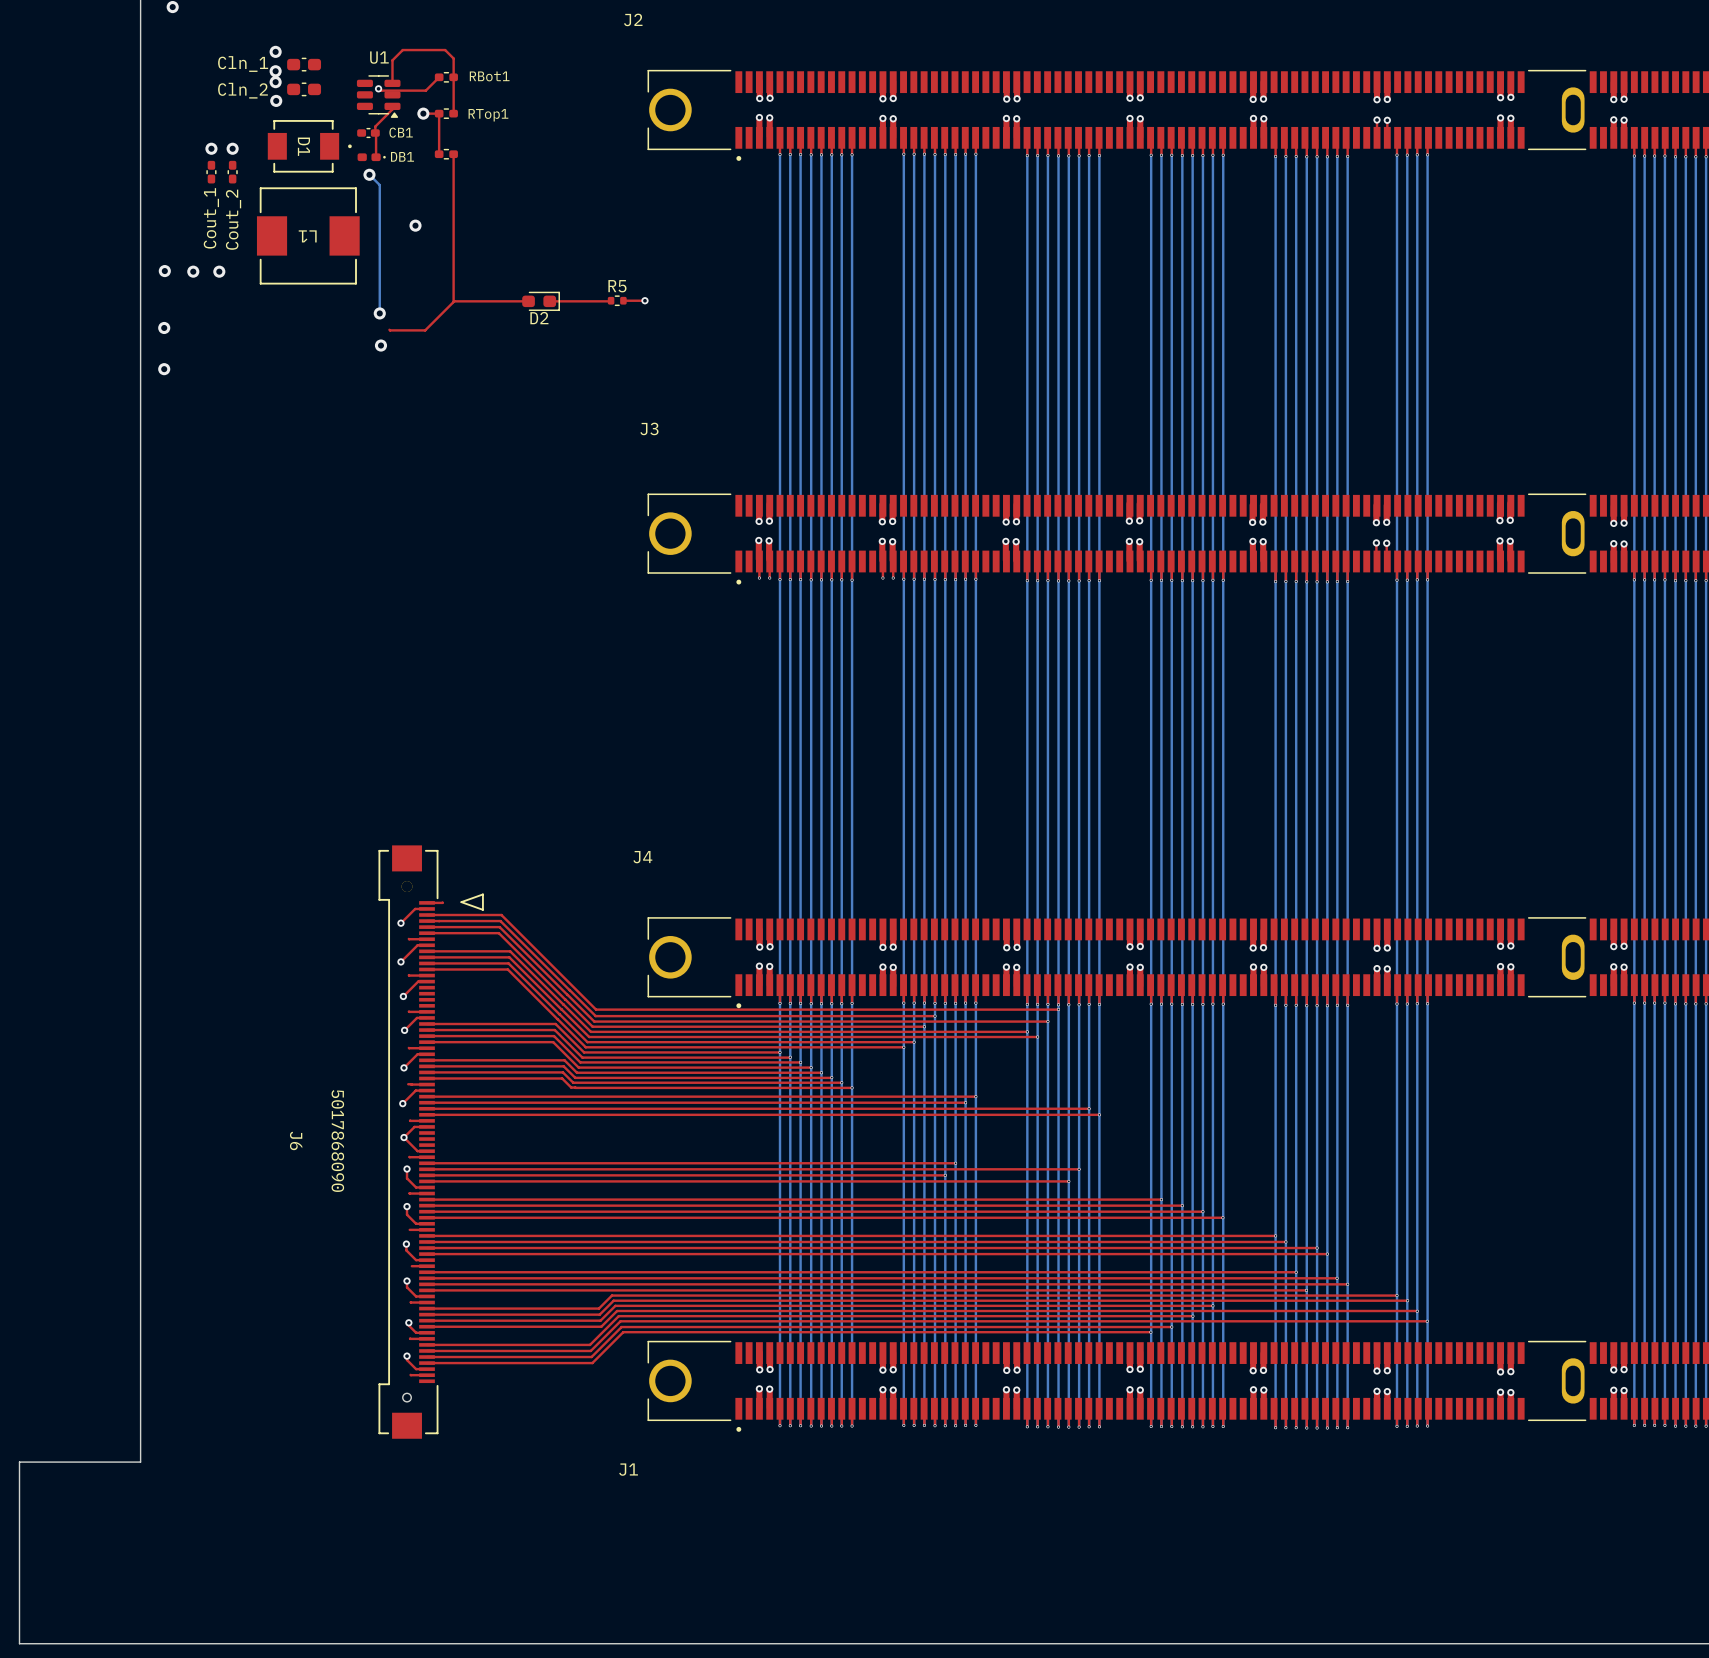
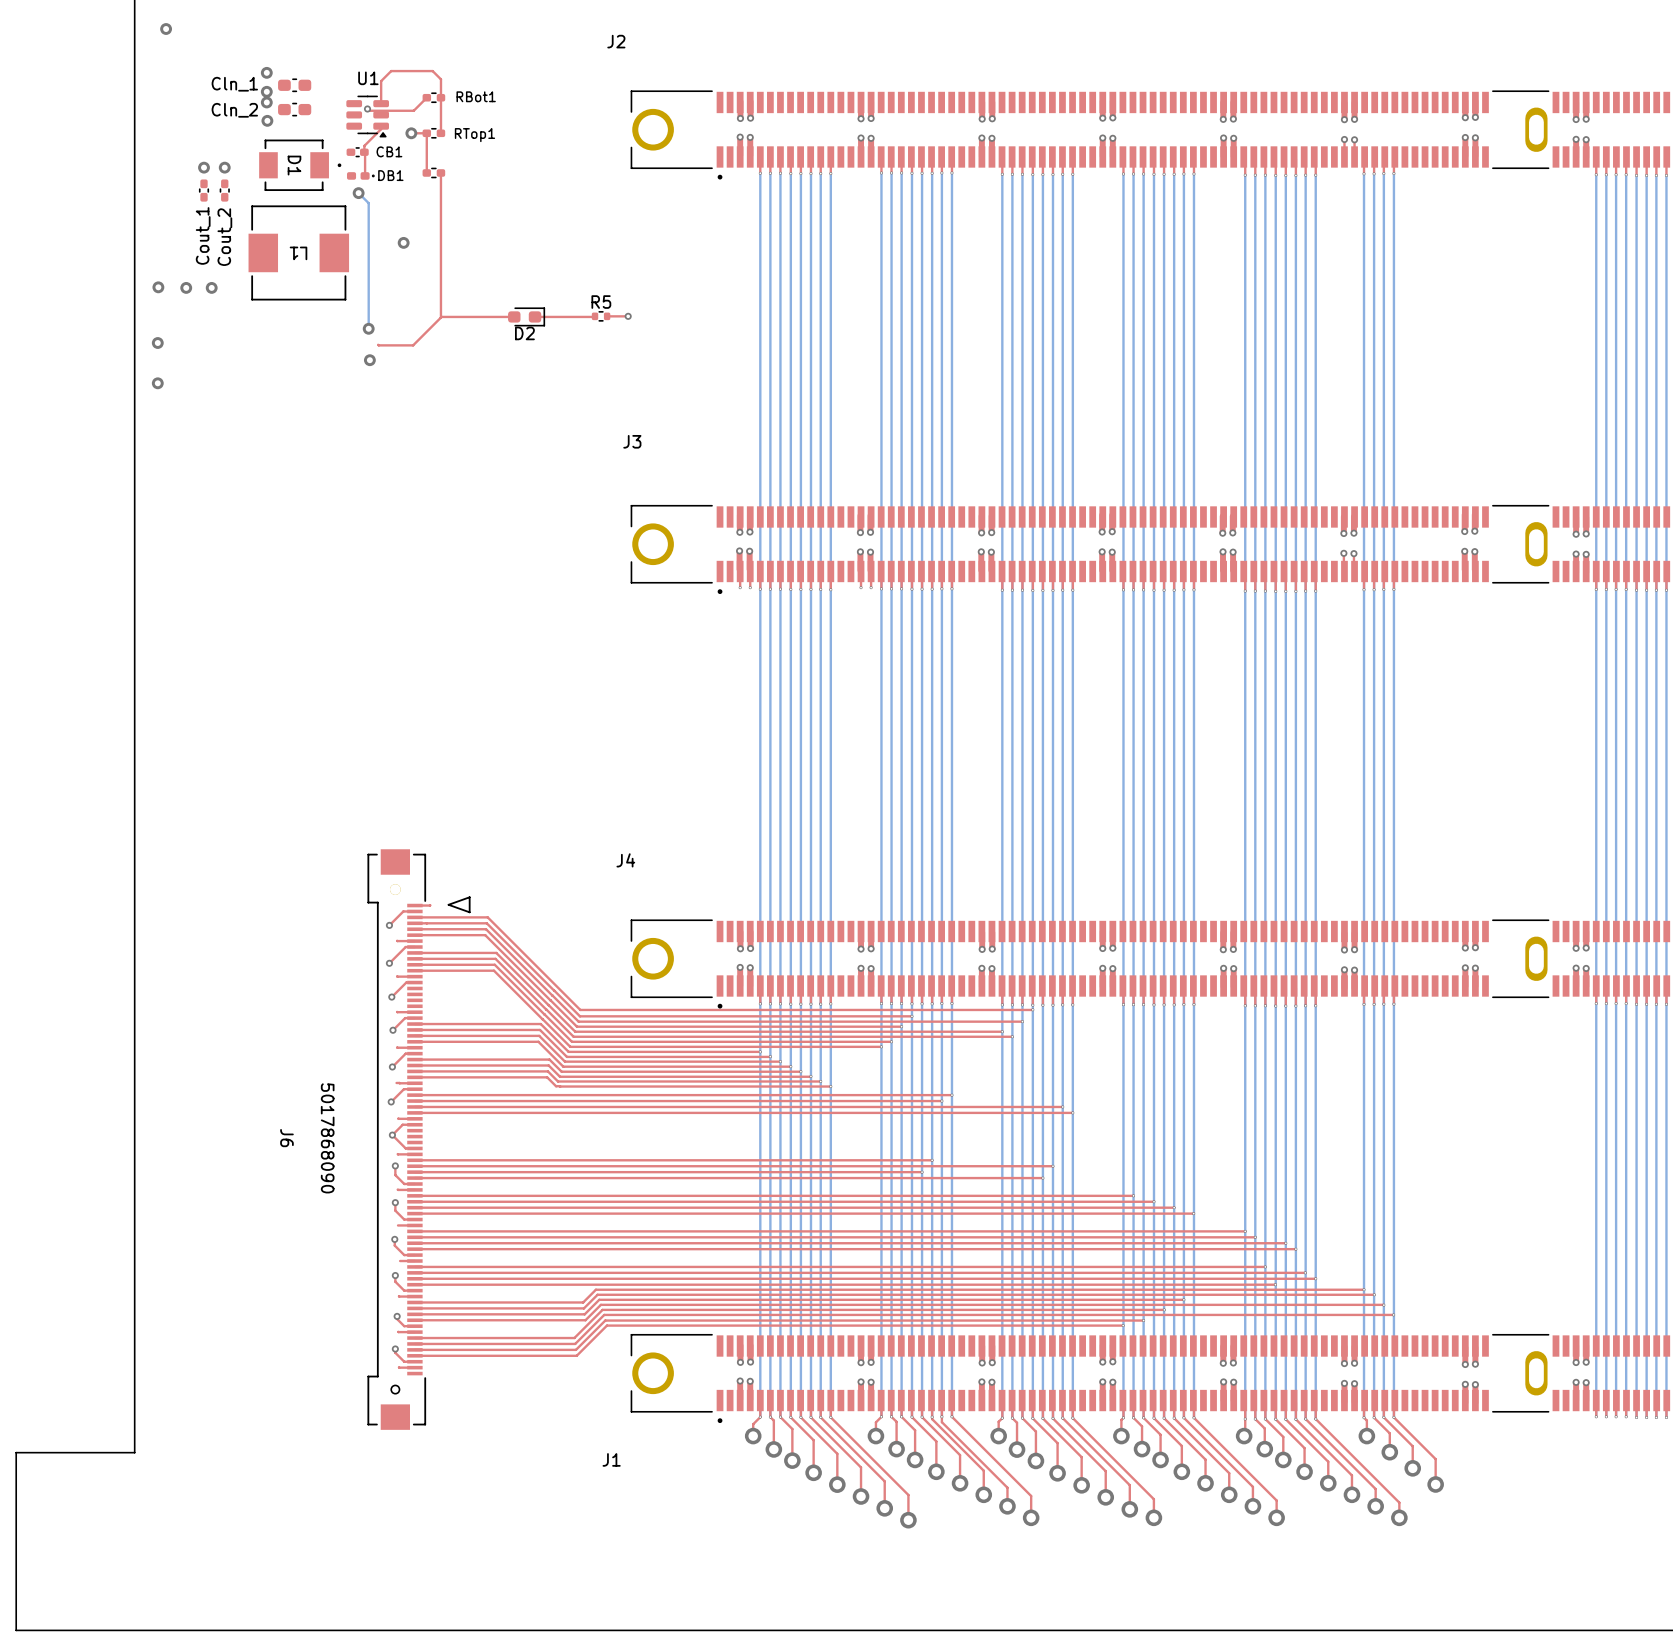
top track: none -> (760, 1417) (753, 1424) (753, 1436)
top track: none -> (770, 1417) (773, 1420) (773, 1449)
top track: none -> (780, 1417) (792, 1429) (792, 1460)
top track: none -> (881, 1416) (875, 1422) (875, 1436)
top track: none -> (891, 1416) (896, 1421) (896, 1449)
top track: none -> (901, 1416) (915, 1430) (915, 1459)
top track: none -> (911, 1417) (936, 1441) (936, 1471)
top track: none -> (922, 1417) (960, 1455) (960, 1483)
top track: none -> (932, 1417) (983, 1470) (983, 1494)
top track: none -> (941, 1416) (941, 1422) (1007, 1487) (1007, 1506)
top track: none -> (951, 1416) (1031, 1496) (1031, 1517)
top track: none -> (790, 1417) (813, 1440) (813, 1472)
top track: none -> (800, 1417) (837, 1453) (837, 1484)
top track: none -> (810, 1417) (861, 1467) (861, 1496)
top track: none -> (820, 1417) (884, 1481) (884, 1508)
top track: none -> (830, 1417) (908, 1495) (908, 1520)
top track: none -> (1002, 1418) (998, 1421) (998, 1436)
top track: none -> (1012, 1418) (1017, 1422) (1017, 1449)
top track: none -> (1022, 1418) (1035, 1431) (1035, 1460)
top track: none -> (1062, 1418) (1129, 1485) (1129, 1509)
top track: none -> (1072, 1418) (1153, 1499) (1153, 1517)
top track: none -> (1123, 1417) (1121, 1419) (1121, 1436)
top track: none -> (1133, 1417) (1142, 1426) (1142, 1449)
top track: none -> (1143, 1417) (1160, 1434) (1160, 1459)
top track: none -> (1153, 1418) (1181, 1445) (1181, 1471)
top track: none -> (1164, 1418) (1205, 1459) (1205, 1483)
top track: none -> (1174, 1418) (1229, 1473) (1229, 1494)
top track: none -> (1183, 1417) (1252, 1486) (1252, 1506)
top track: none -> (1193, 1417) (1276, 1500) (1276, 1517)
top track: none -> (1364, 1417) (1366, 1420) (1366, 1436)
top track: none -> (1374, 1417) (1389, 1433) (1389, 1452)
top track: none -> (1383, 1417) (1412, 1446) (1412, 1468)
top track: none -> (1393, 1417) (1435, 1459) (1435, 1484)
top track: none -> (1032, 1418) (1057, 1443) (1057, 1473)
top track: none -> (1042, 1418) (1081, 1457) (1081, 1485)
top track: none -> (1052, 1418) (1105, 1471) (1105, 1497)
top track: none -> (1245, 1419) (1244, 1436)
top track: none -> (1255, 1419) (1264, 1428) (1264, 1449)
top track: none -> (1265, 1419) (1283, 1436) (1283, 1459)
top track: none -> (1305, 1419) (1375, 1489) (1375, 1506)
top track: none -> (1315, 1419) (1399, 1502) (1399, 1517)
top track: none -> (1275, 1419) (1304, 1448) (1304, 1471)
top track: none -> (1285, 1419) (1328, 1461) (1328, 1483)
top track: none -> (1295, 1419) (1351, 1475) (1351, 1494)
via: none -> (753, 1436)
via: none -> (875, 1436)
via: none -> (998, 1436)
via: none -> (1121, 1436)
via: none -> (1244, 1436)
via: none -> (1366, 1436)
via: none -> (773, 1449)
via: none -> (896, 1449)
via: none -> (1017, 1449)
via: none -> (1142, 1449)
via: none -> (1264, 1449)
via: none -> (1389, 1452)
via: none -> (915, 1459)
via: none -> (1160, 1459)
via: none -> (1283, 1459)
via: none -> (792, 1460)
via: none -> (1035, 1460)
via: none -> (1412, 1468)
via: none -> (936, 1471)
via: none -> (1181, 1471)
via: none -> (1304, 1471)
via: none -> (813, 1472)
via: none -> (1057, 1473)
via: none -> (960, 1483)
via: none -> (1205, 1483)
via: none -> (1328, 1483)
via: none -> (837, 1484)
via: none -> (1435, 1484)
via: none -> (1081, 1485)
via: none -> (983, 1494)
via: none -> (1229, 1494)
via: none -> (1351, 1494)
via: none -> (861, 1496)
via: none -> (1105, 1497)
via: none -> (1007, 1506)
via: none -> (1252, 1506)
via: none -> (1375, 1506)
via: none -> (884, 1508)
via: none -> (1129, 1509)
via: none -> (1031, 1517)
via: none -> (1153, 1517)
via: none -> (1276, 1517)
via: none -> (1399, 1517)
via: none -> (908, 1520)

